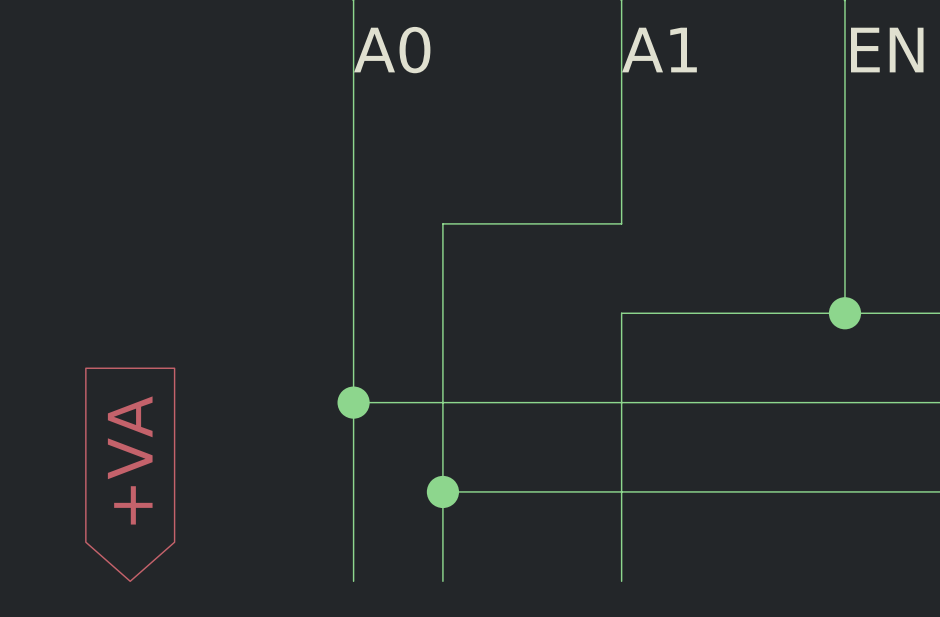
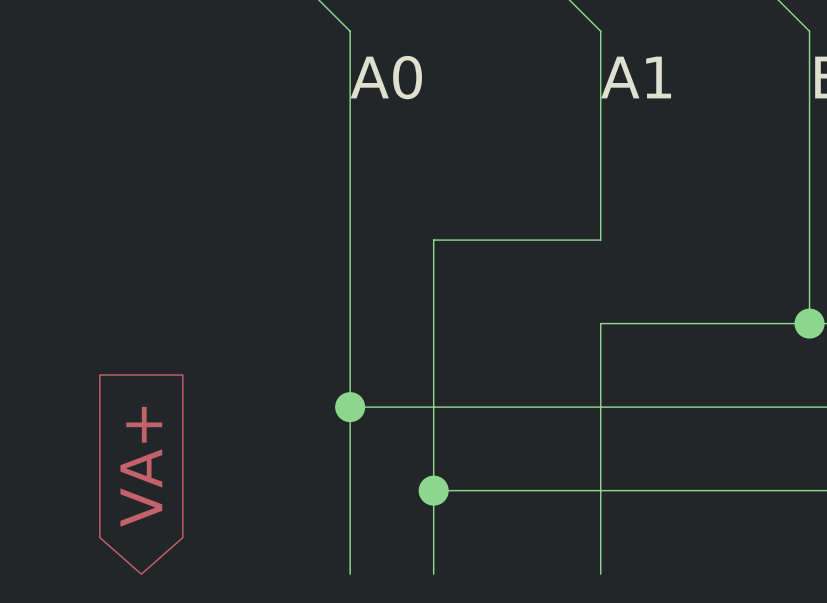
global label: +VA (130, 460) -> VA+ (141, 466)

